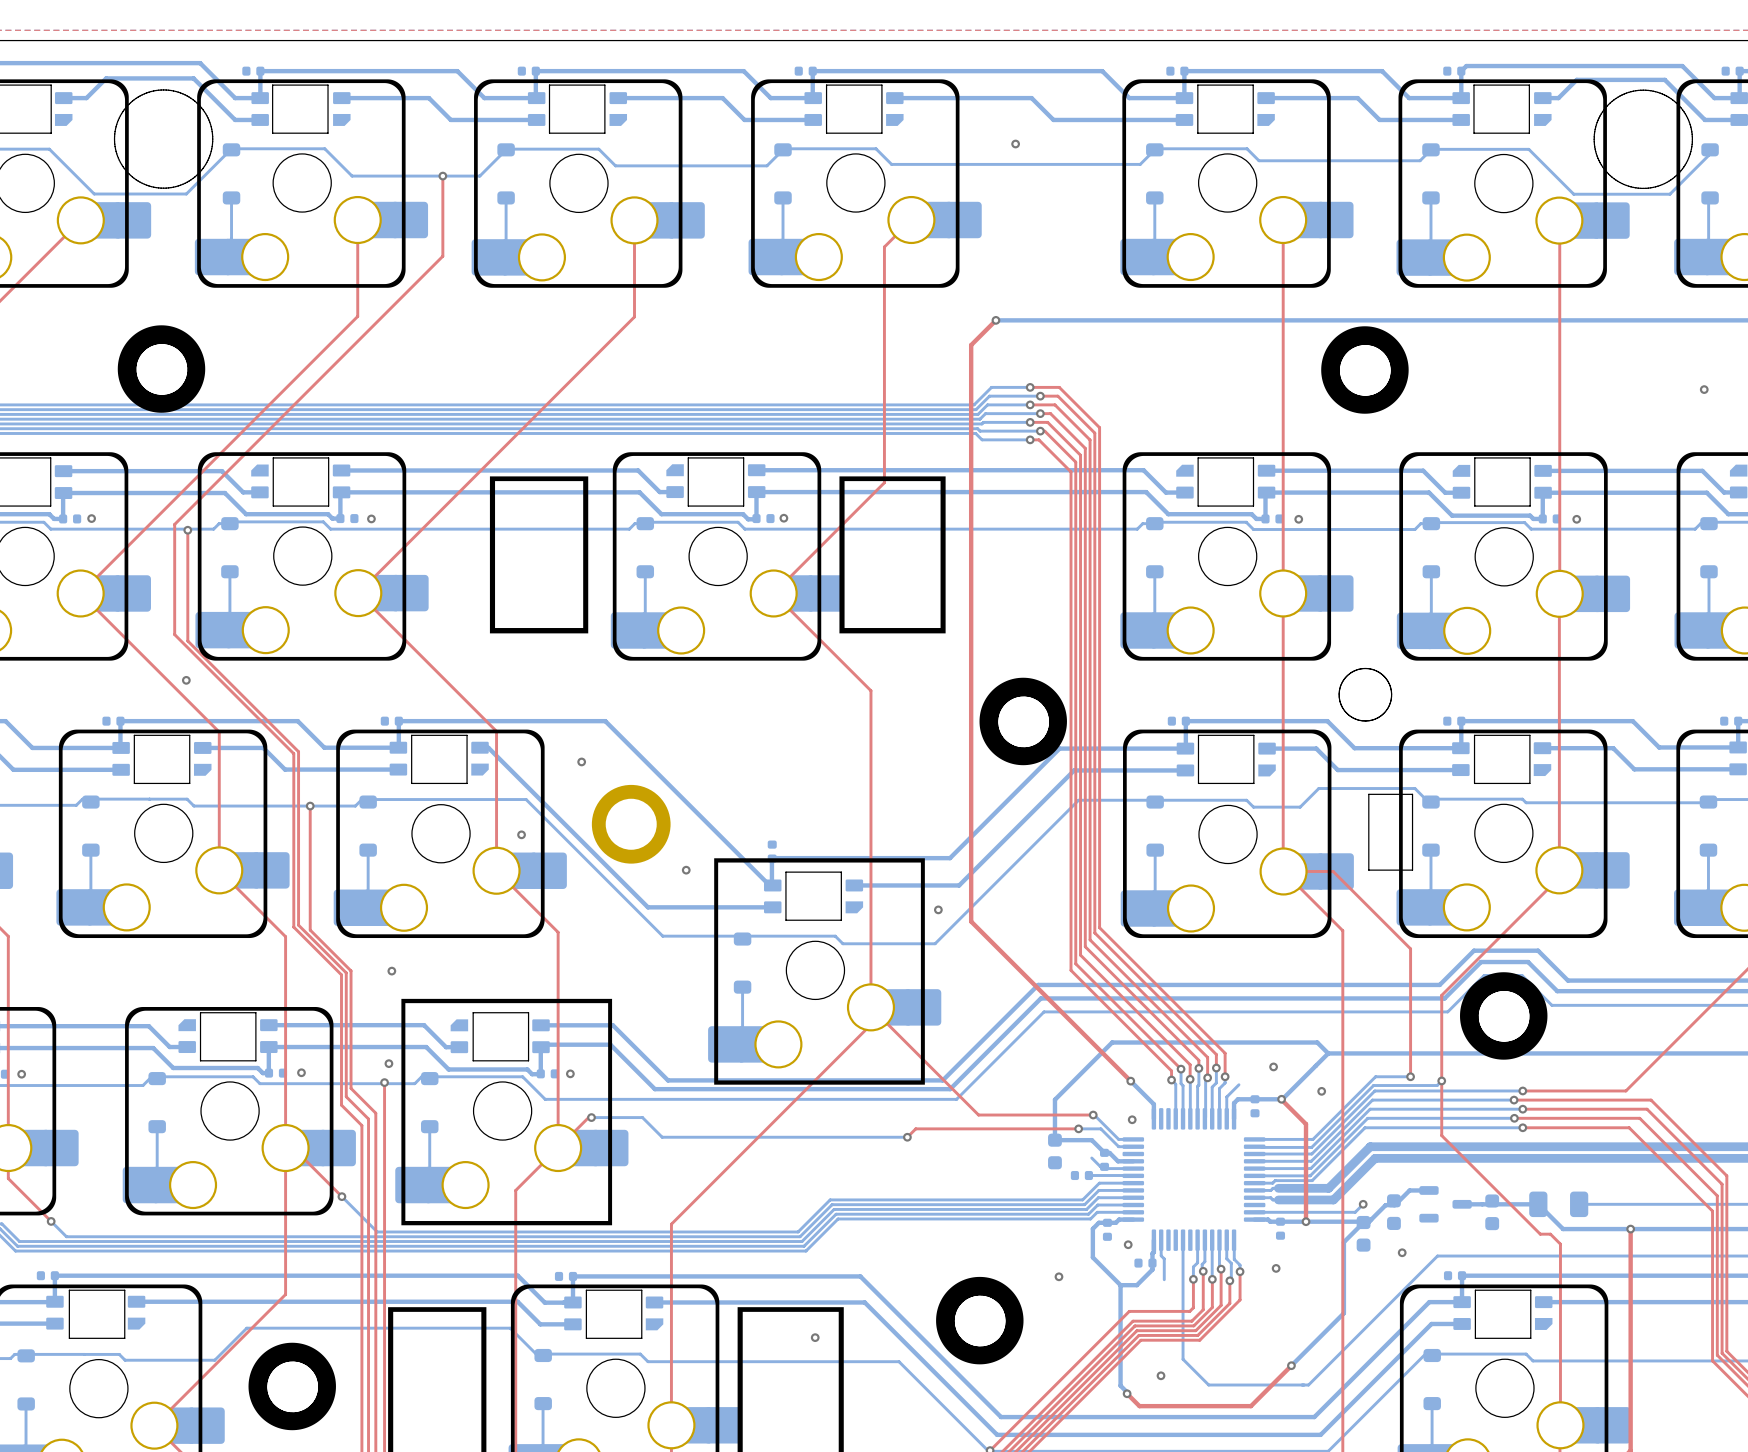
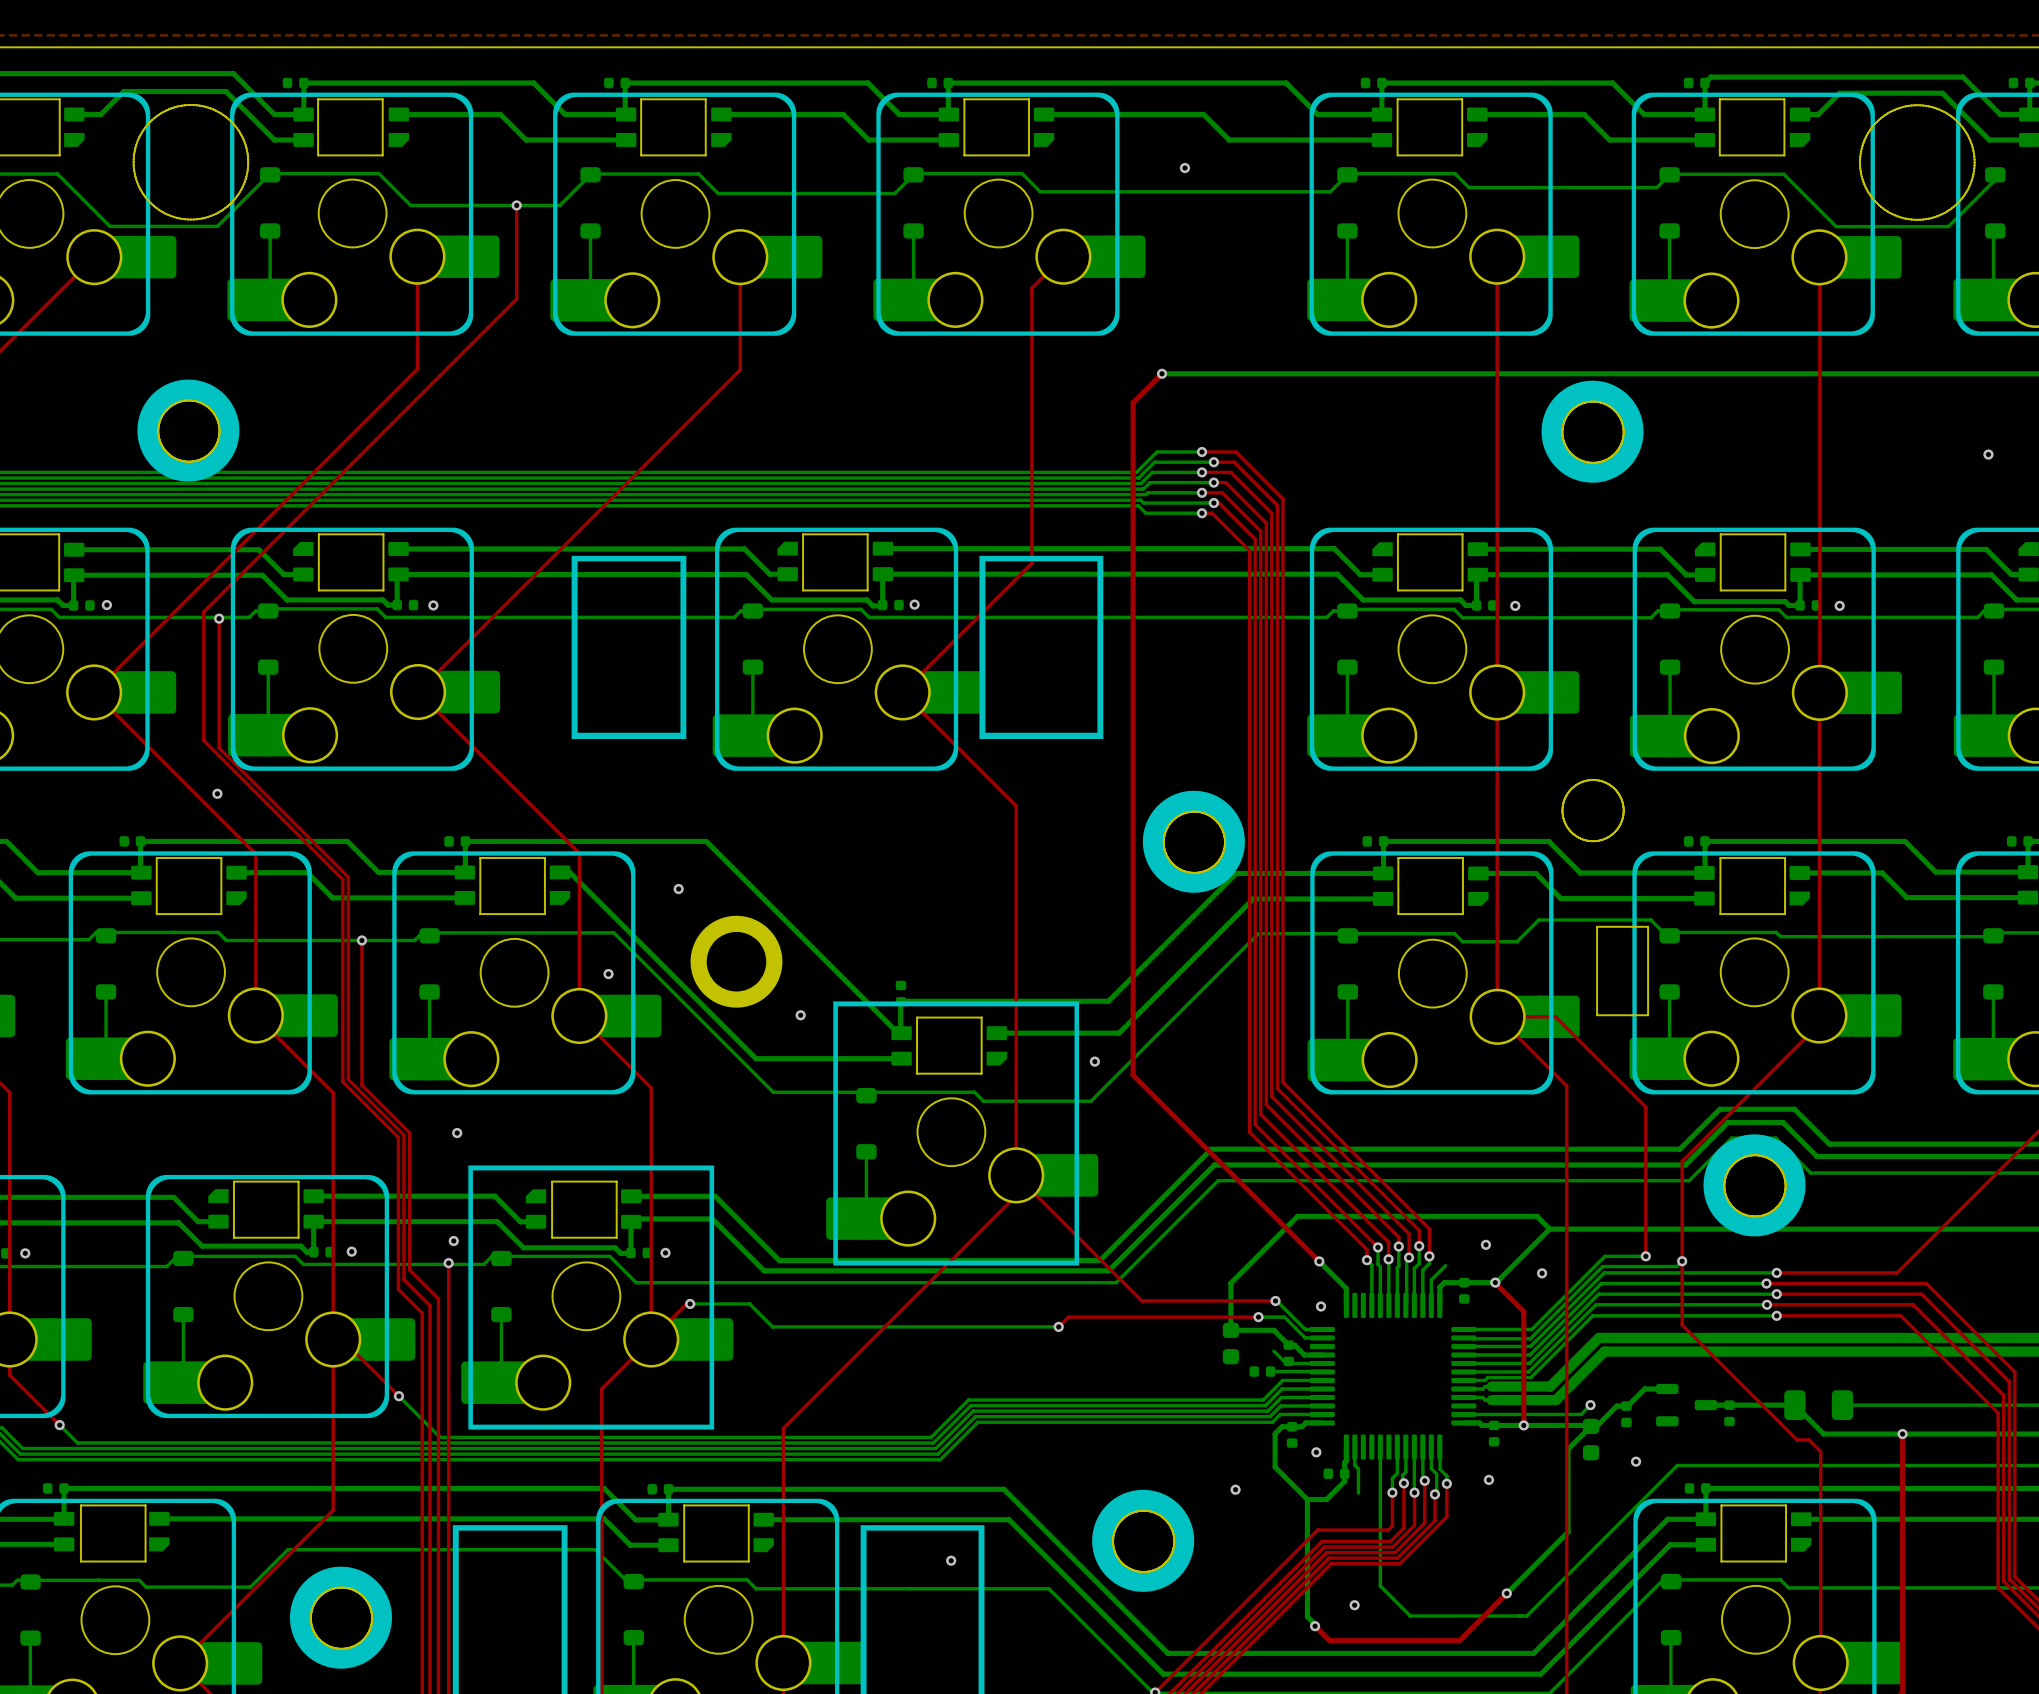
part footprint: [1387, 1194, 1401, 1230] -> [1621, 1401, 1632, 1428]
part footprint: [1485, 1194, 1500, 1231] -> [1724, 1400, 1735, 1427]

